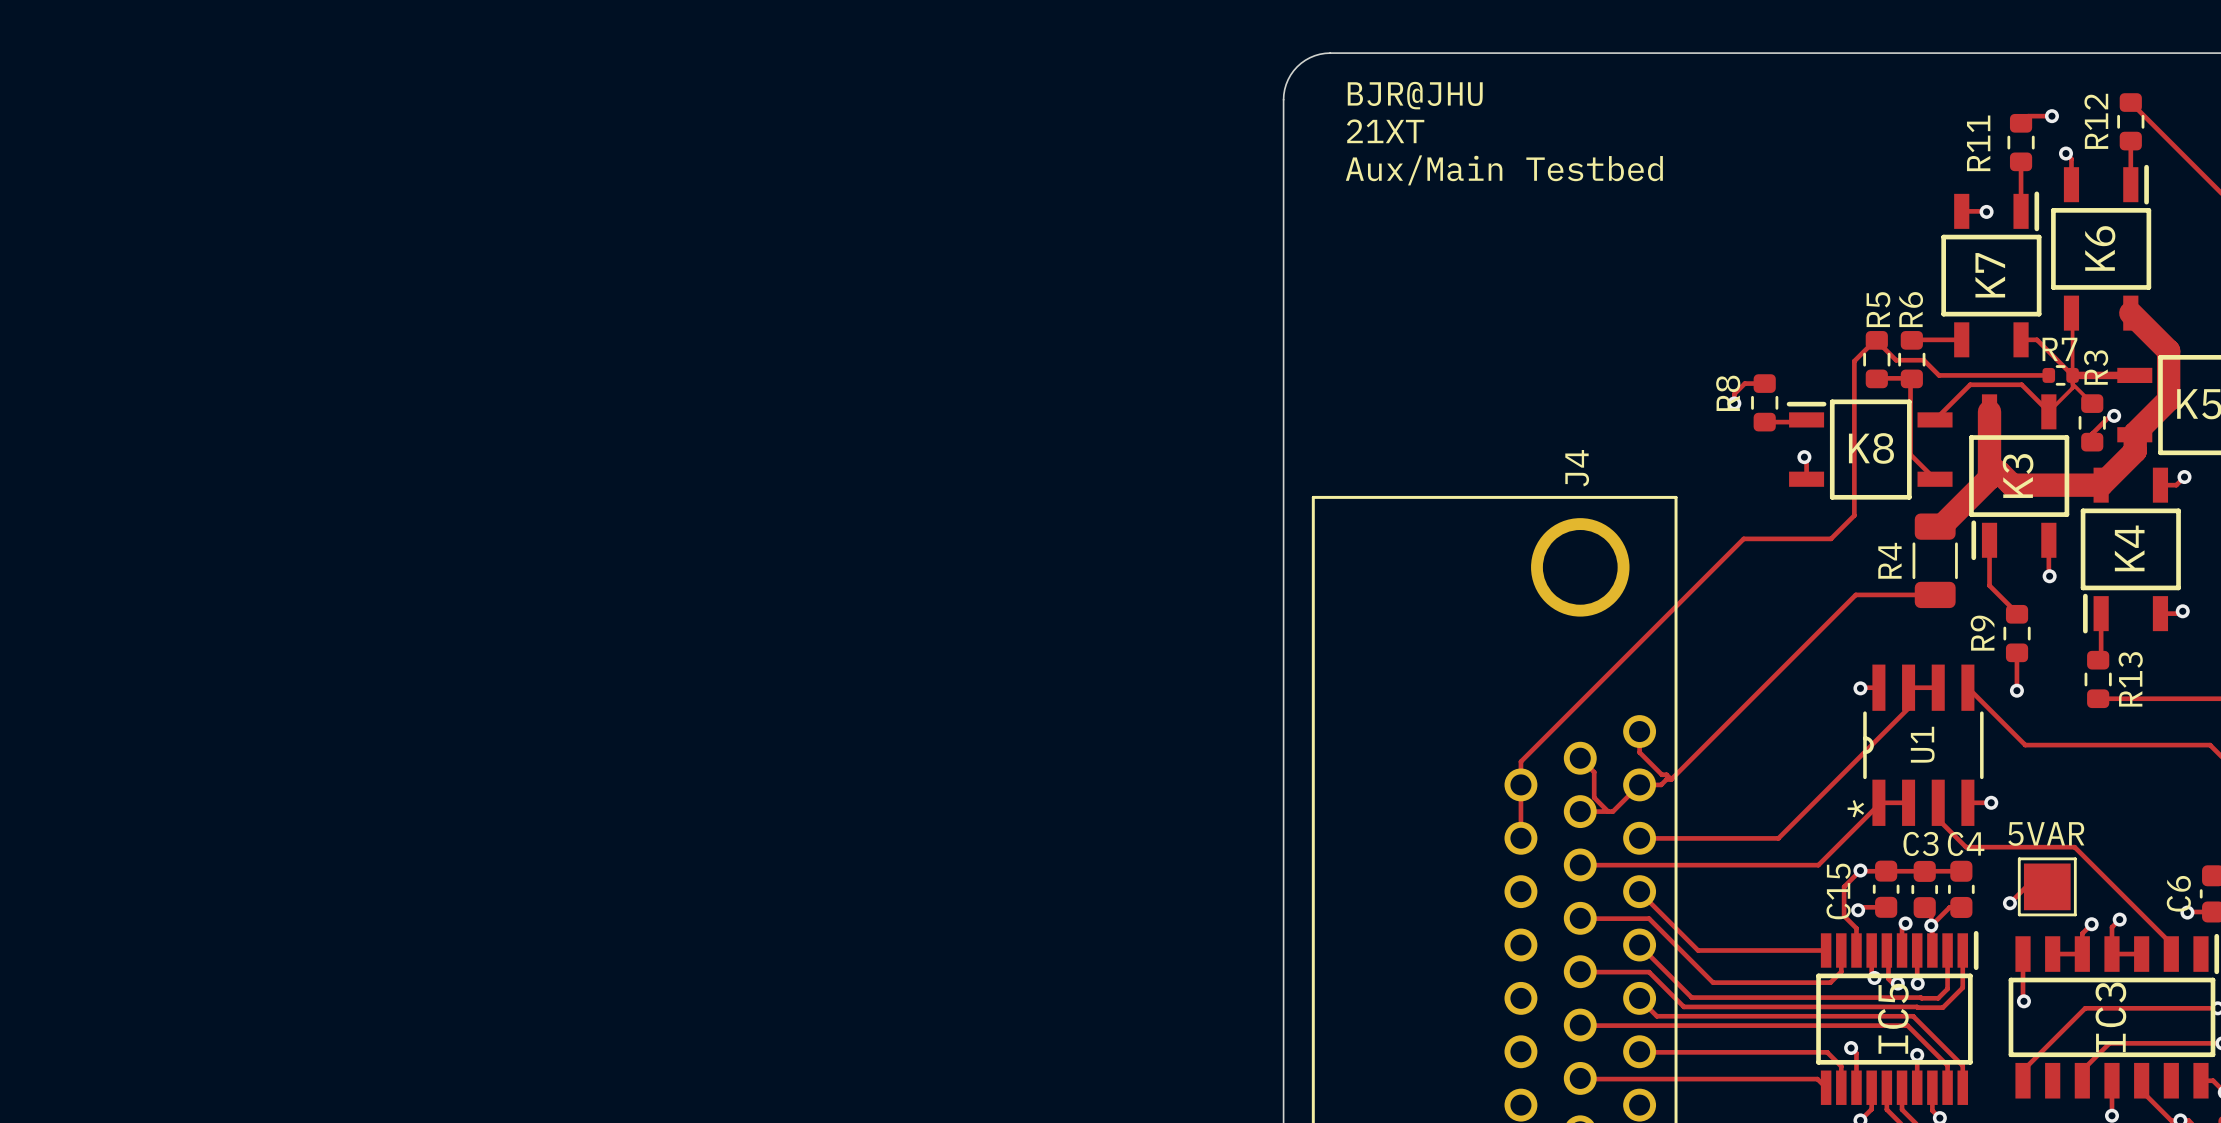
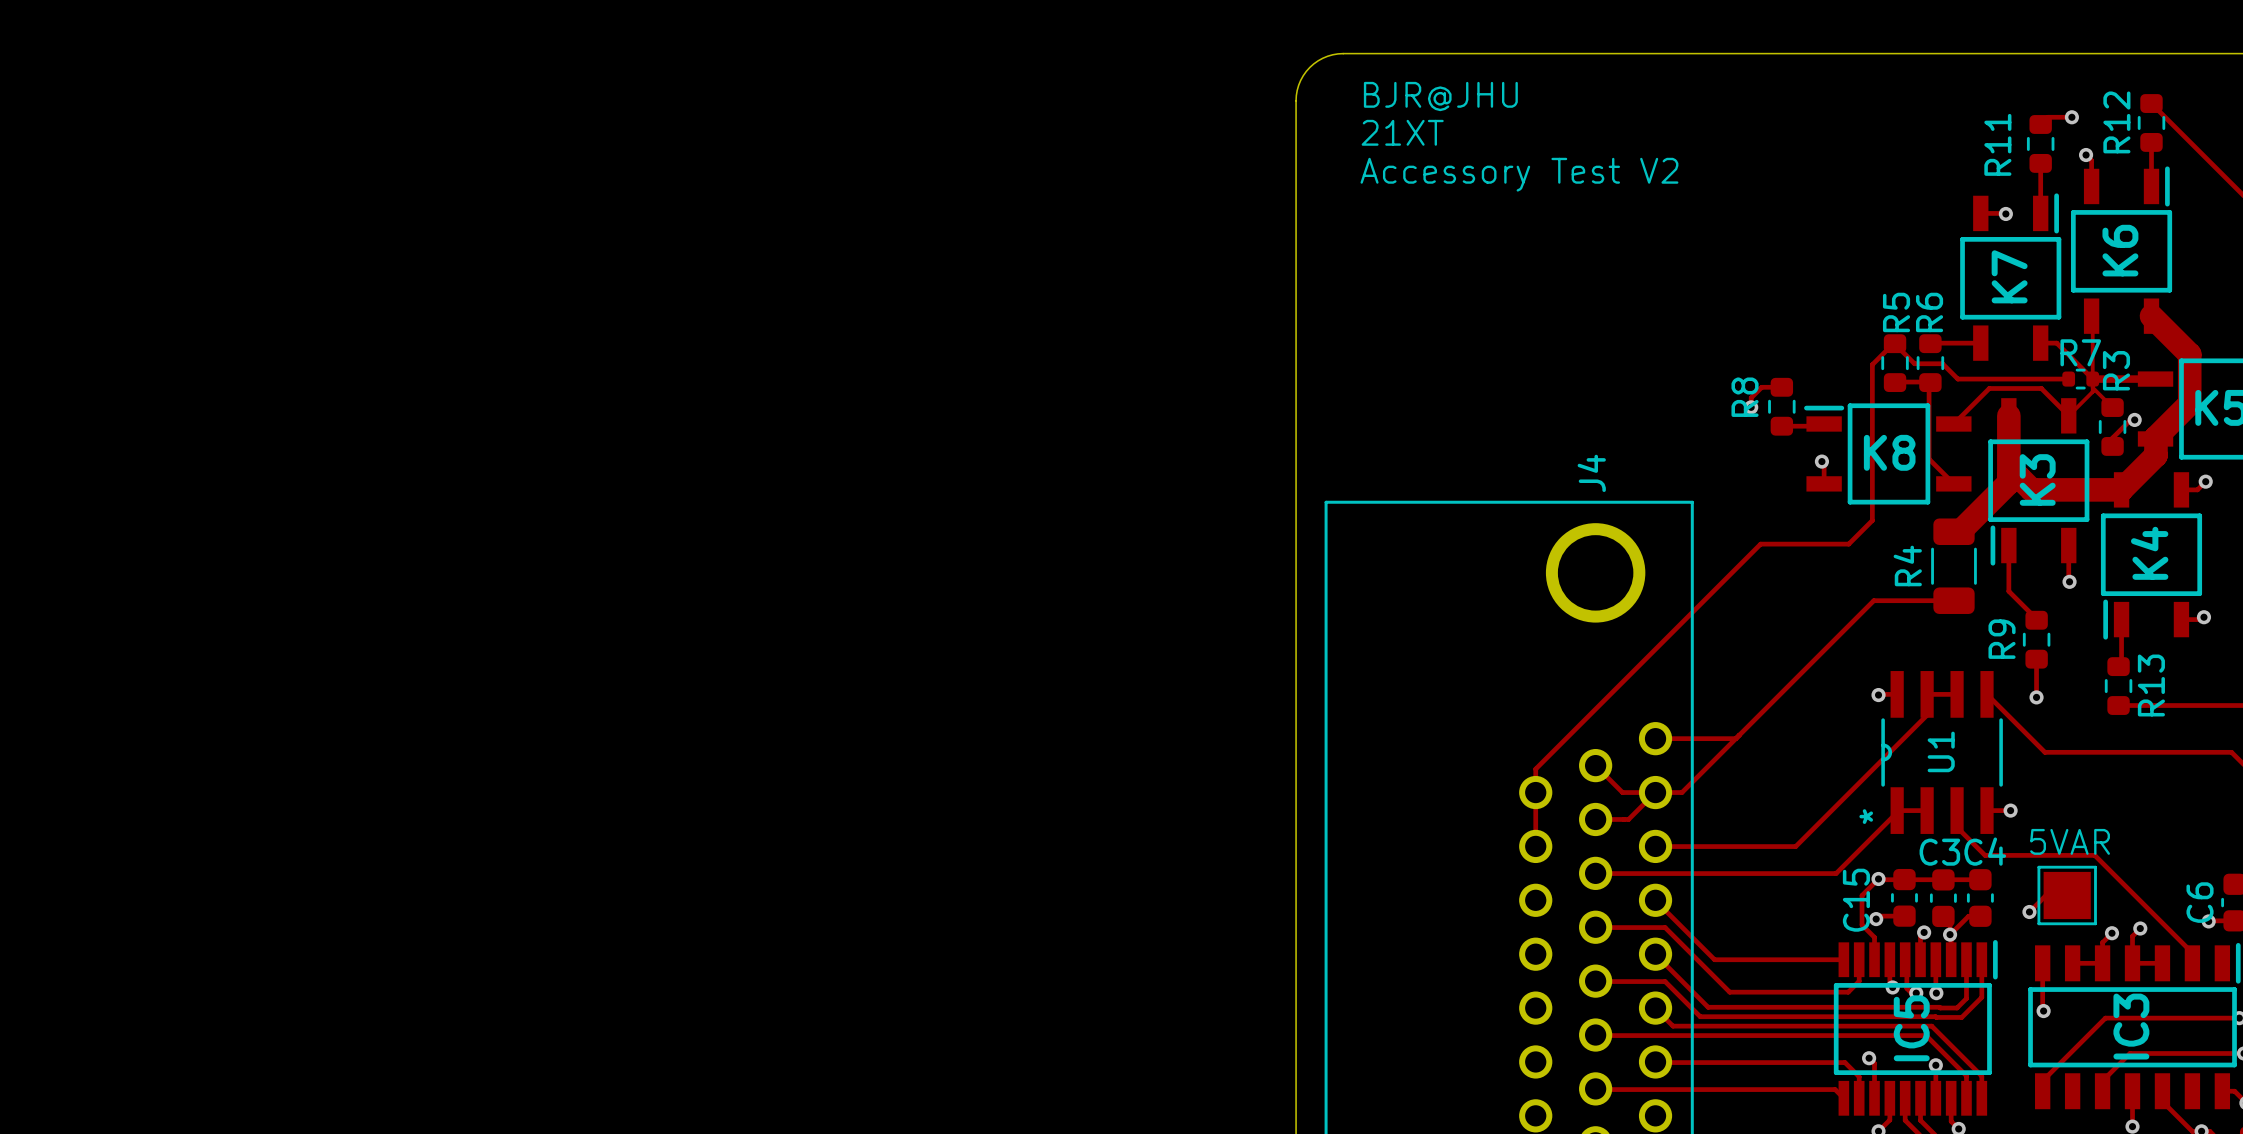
text: Aux/Main Testbed (1504, 170) -> Accessory Test V2 (1519, 174)
track: (1639, 731) (1639, 752) (1661, 774) (1666, 774) (1671, 779) (1666, 779) (1661, 784) -> (1687, 787) (1681, 792) (1677, 792)
track: none -> (1655, 738) (1735, 738)
track: (1594, 772) (1594, 797) (1608, 811) -> (1609, 779) (1622, 792) (1655, 792)

